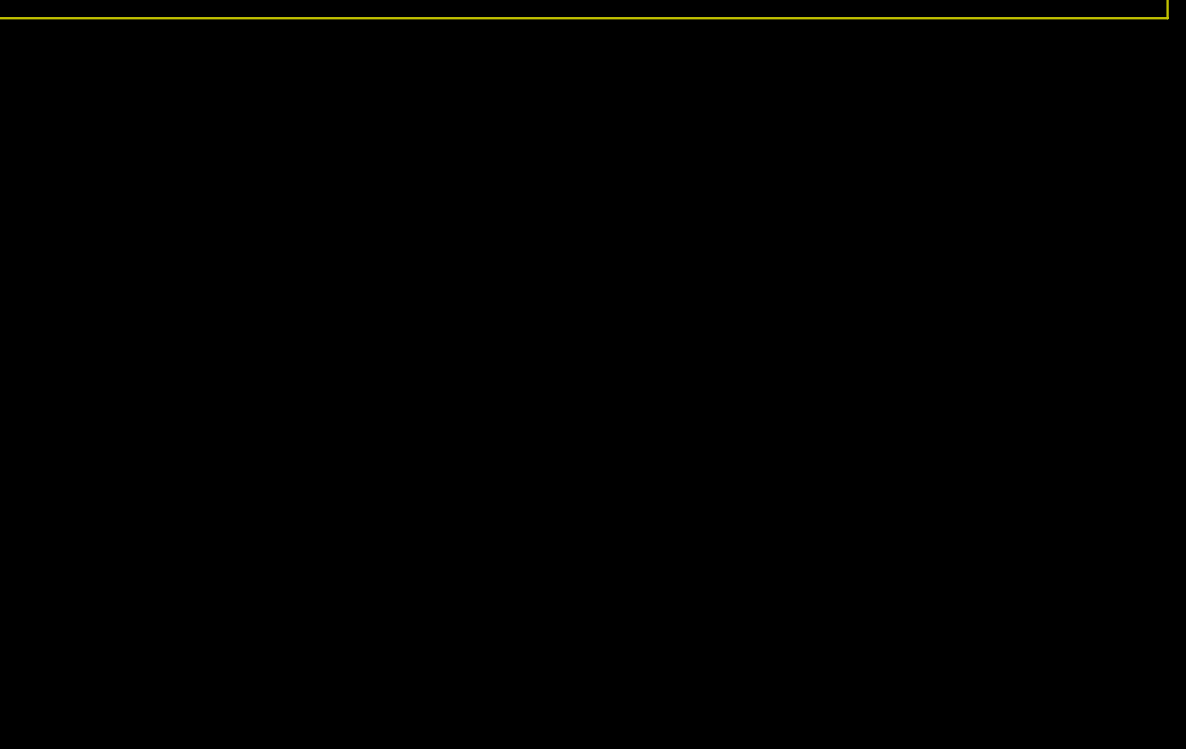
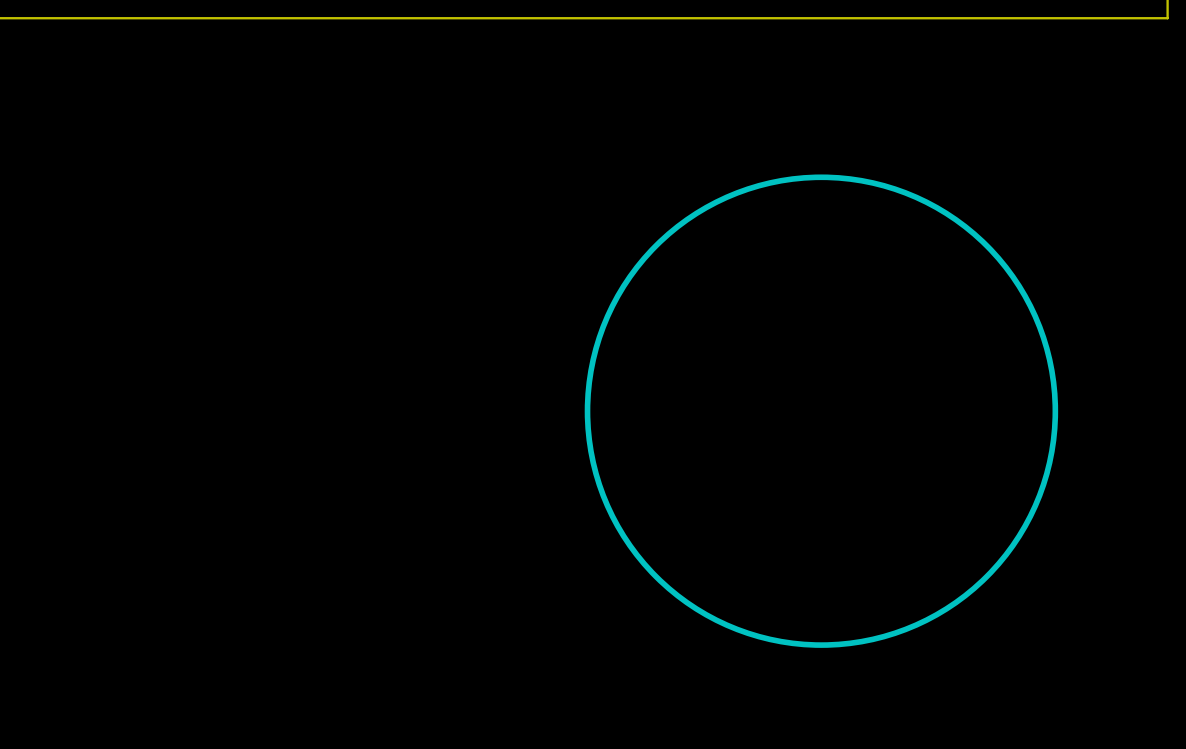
drawing: none -> [584, 174, 1059, 648]

